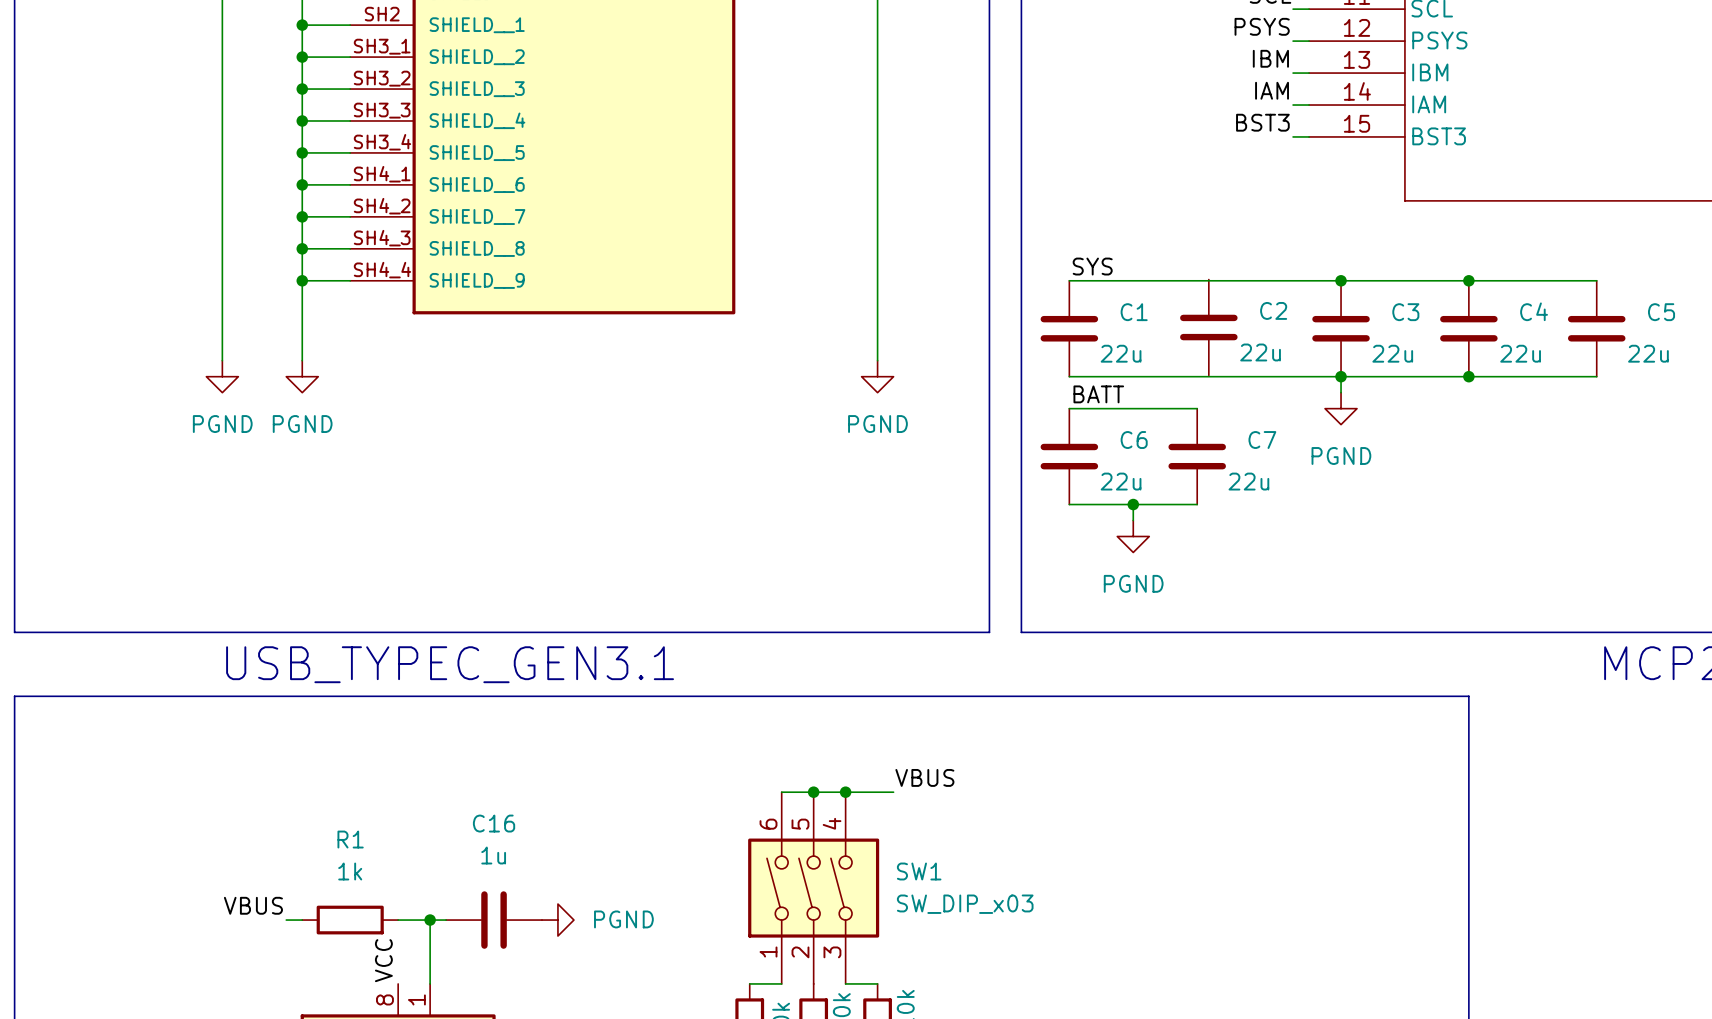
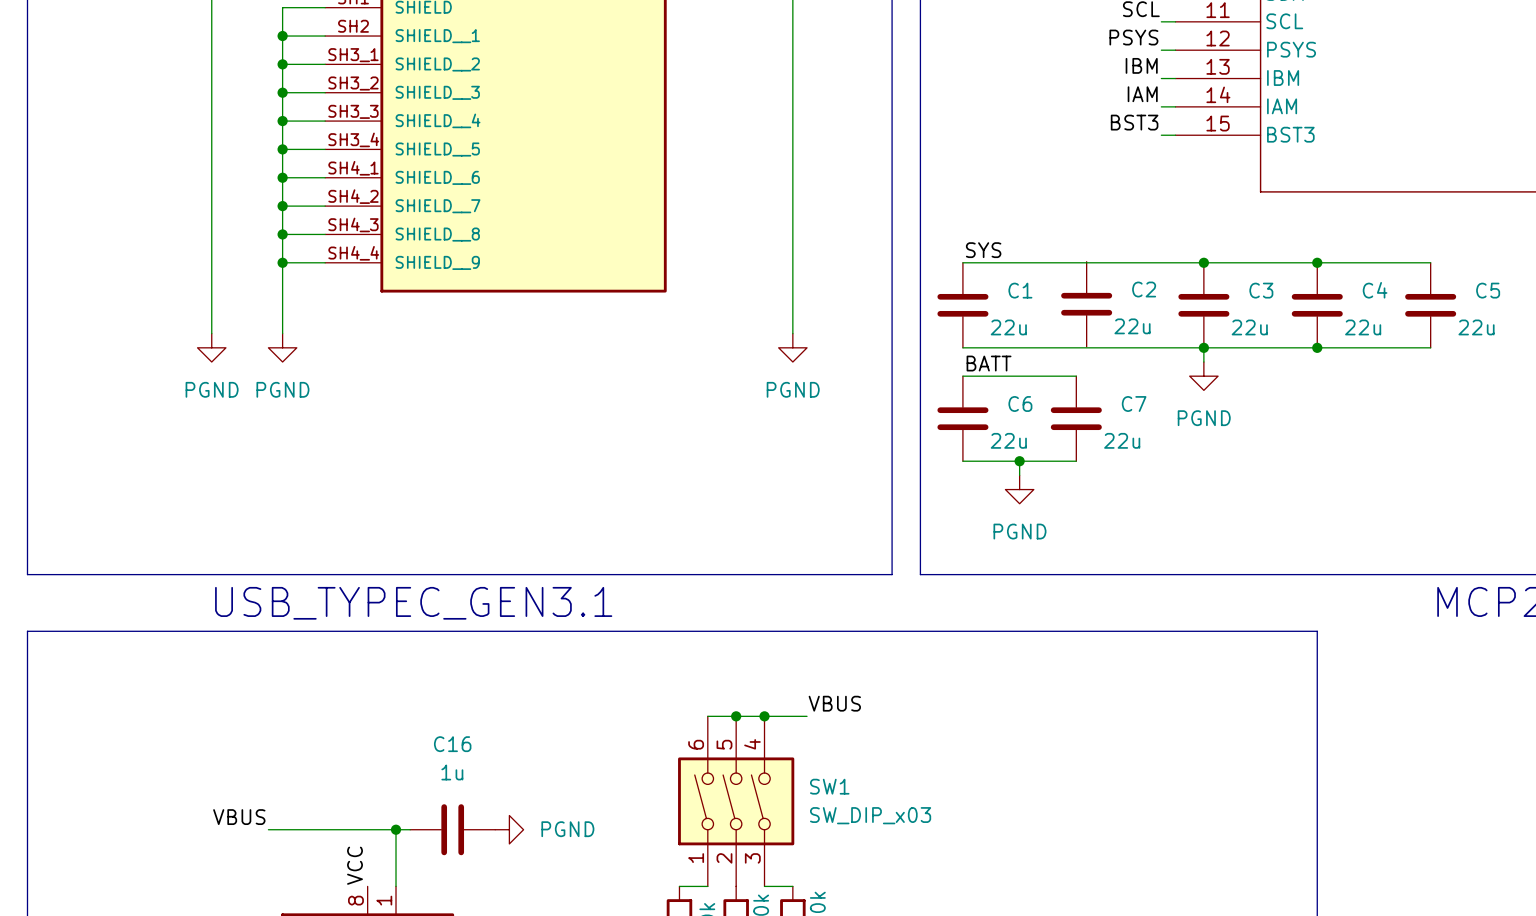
wire: none -> (282, 829) (367, 829)
R1: 1k (350, 920) -> none

